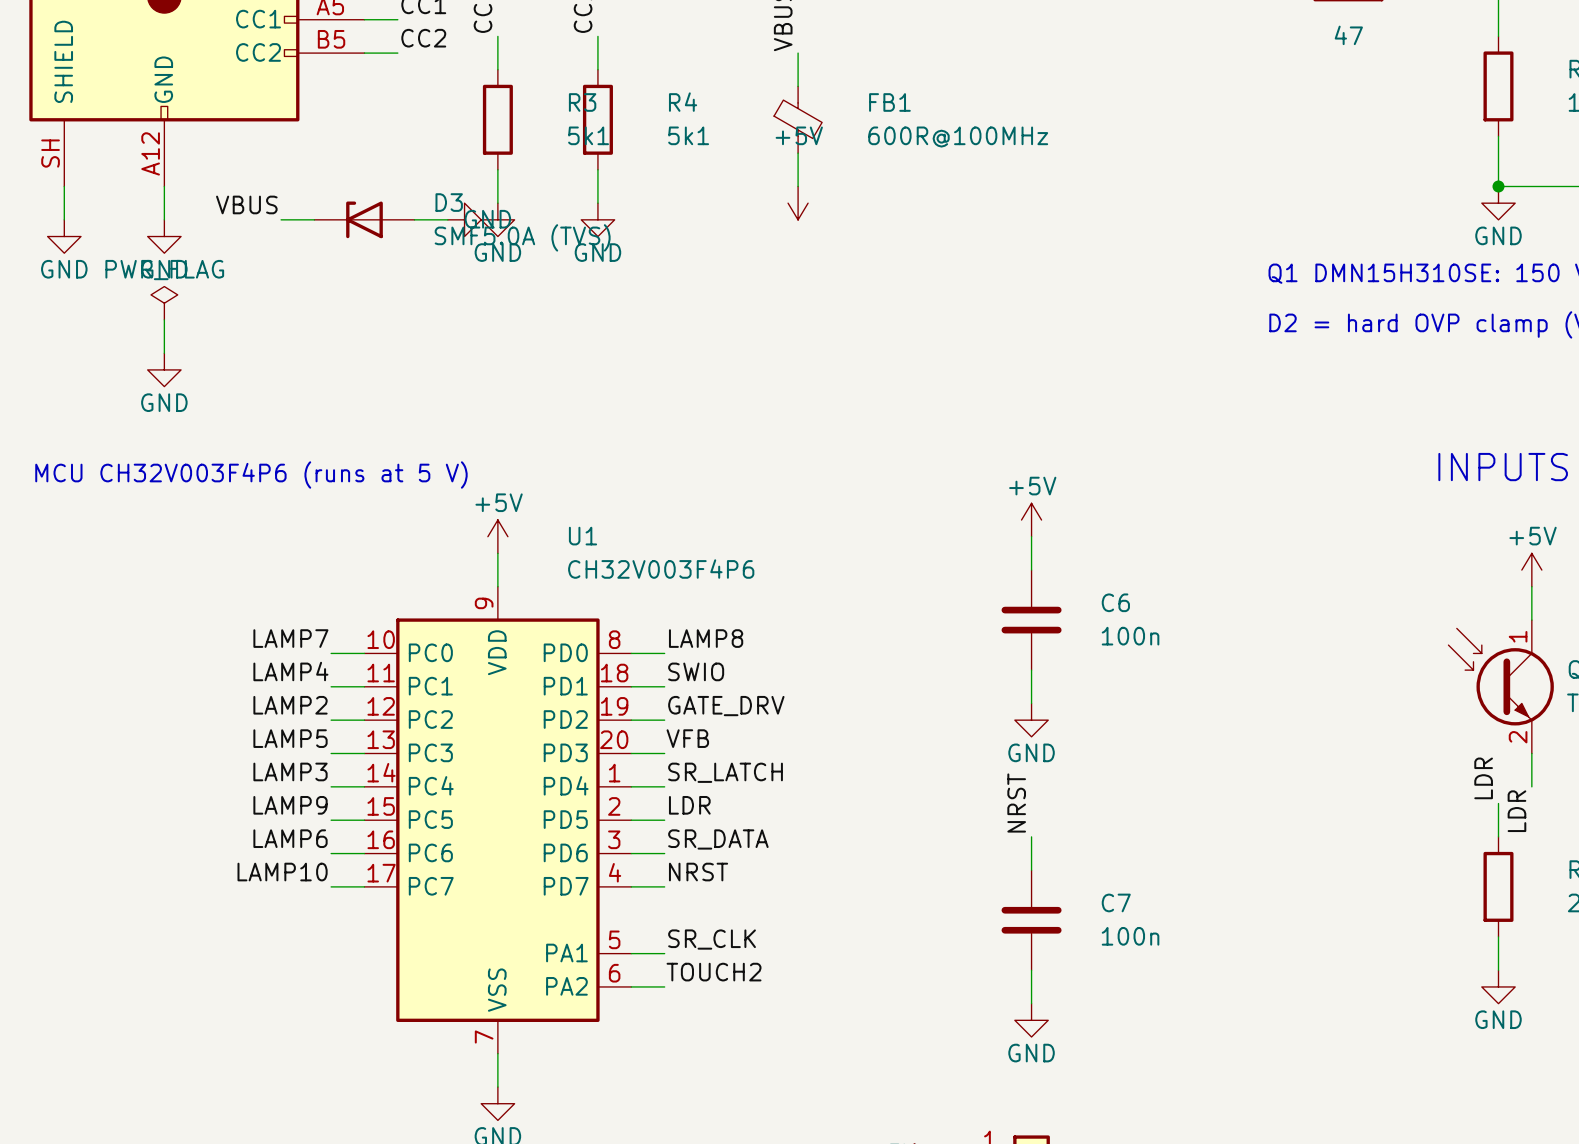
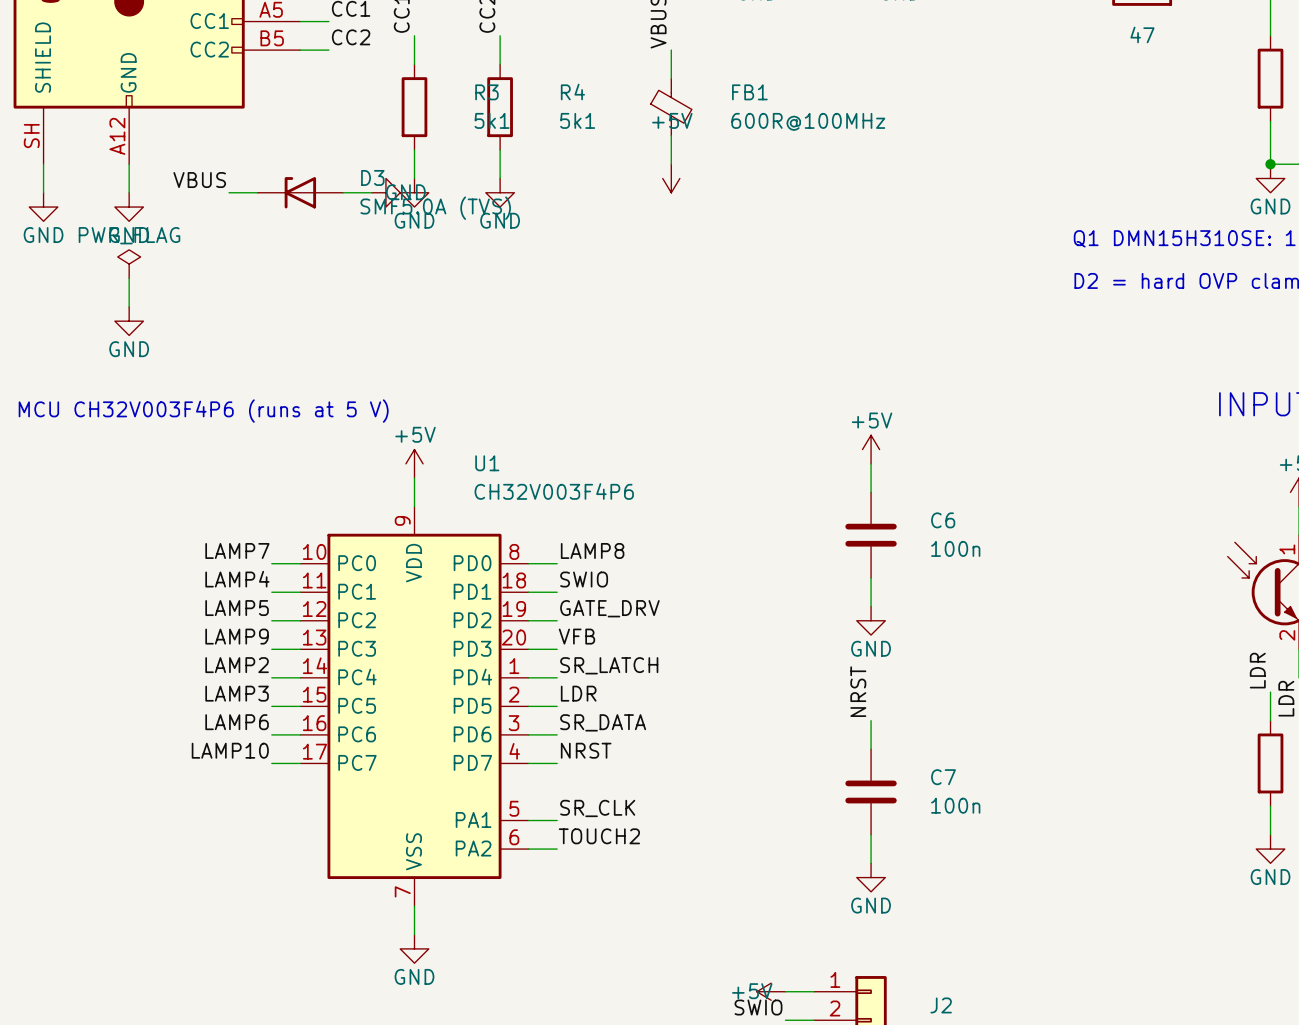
label: LAMP2 (290, 705) -> LAMP5 (237, 608)
label: LAMP5 (290, 738) -> LAMP9 (237, 636)
label: LAMP3 (290, 771) -> LAMP2 (237, 665)
label: LAMP9 (290, 805) -> LAMP3 (237, 693)

